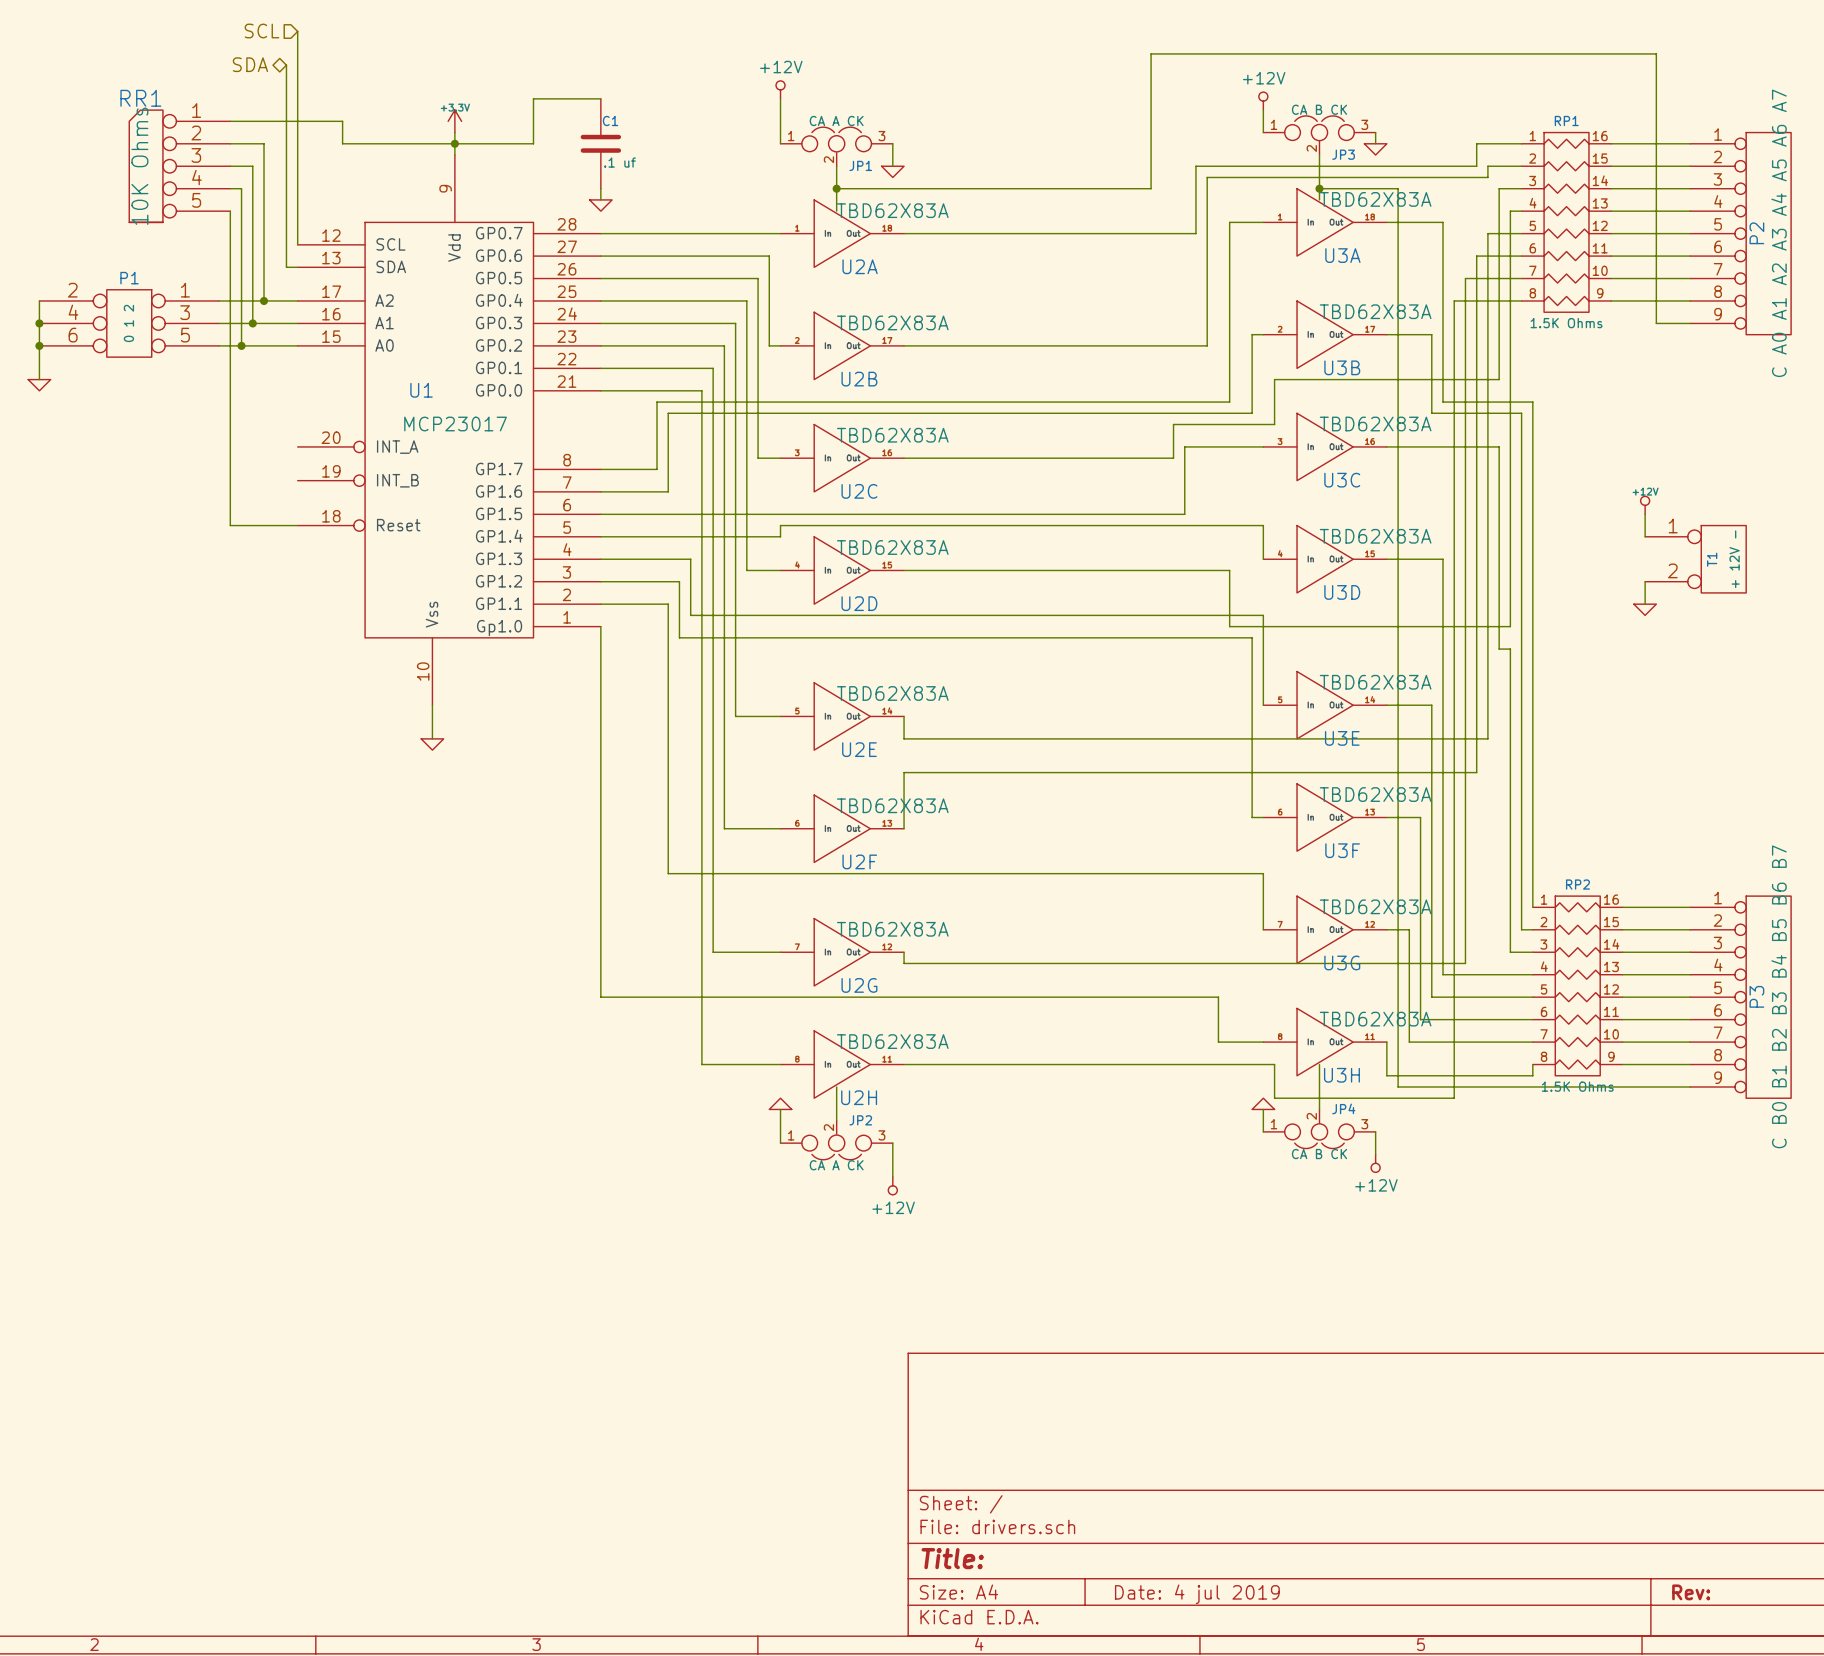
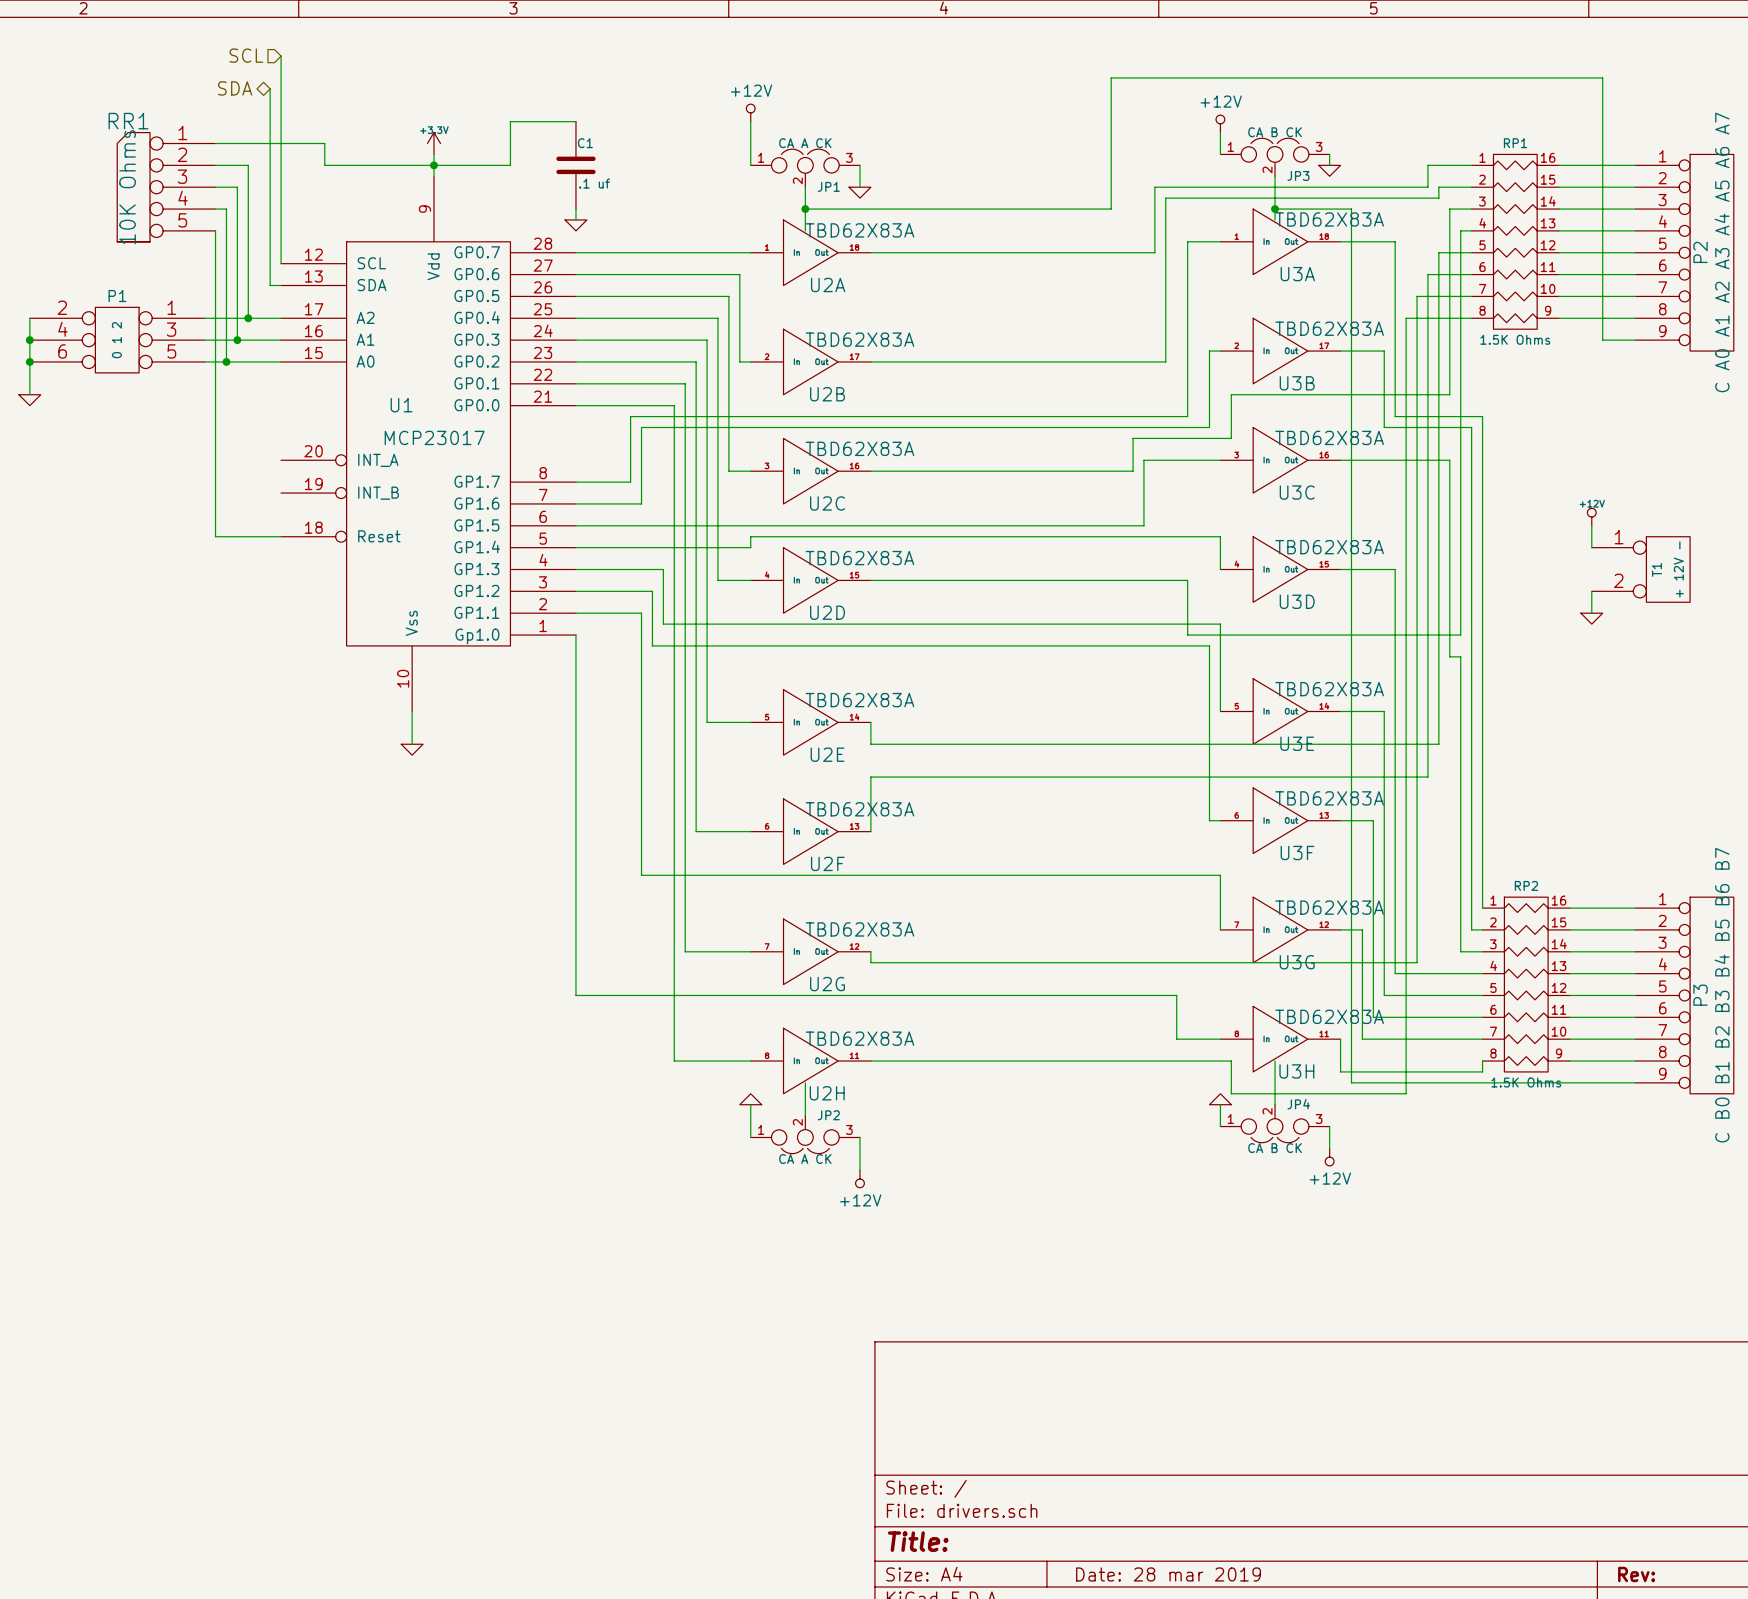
title block: Date: 4 jul 2019 (1197, 1594) -> Date: 28 mar 2019 (1168, 1574)

